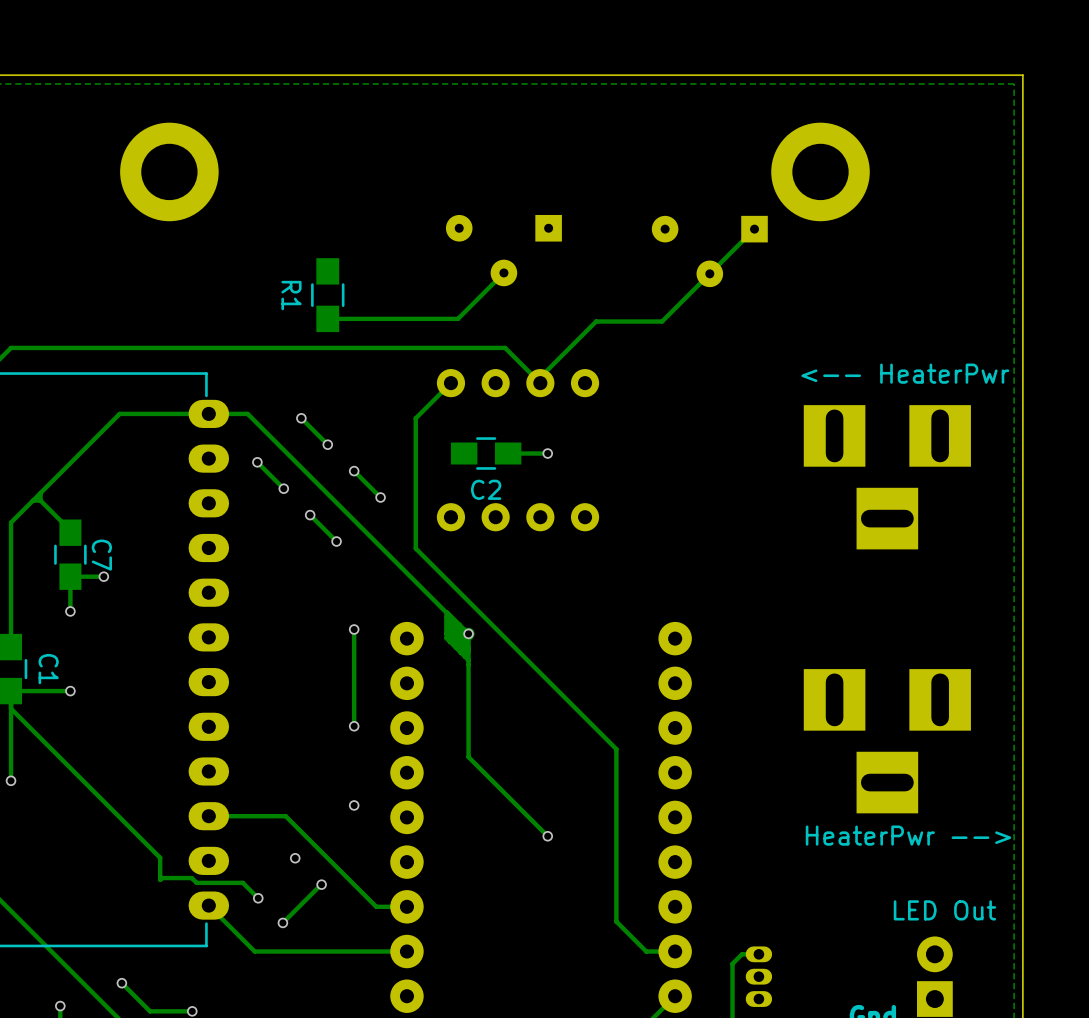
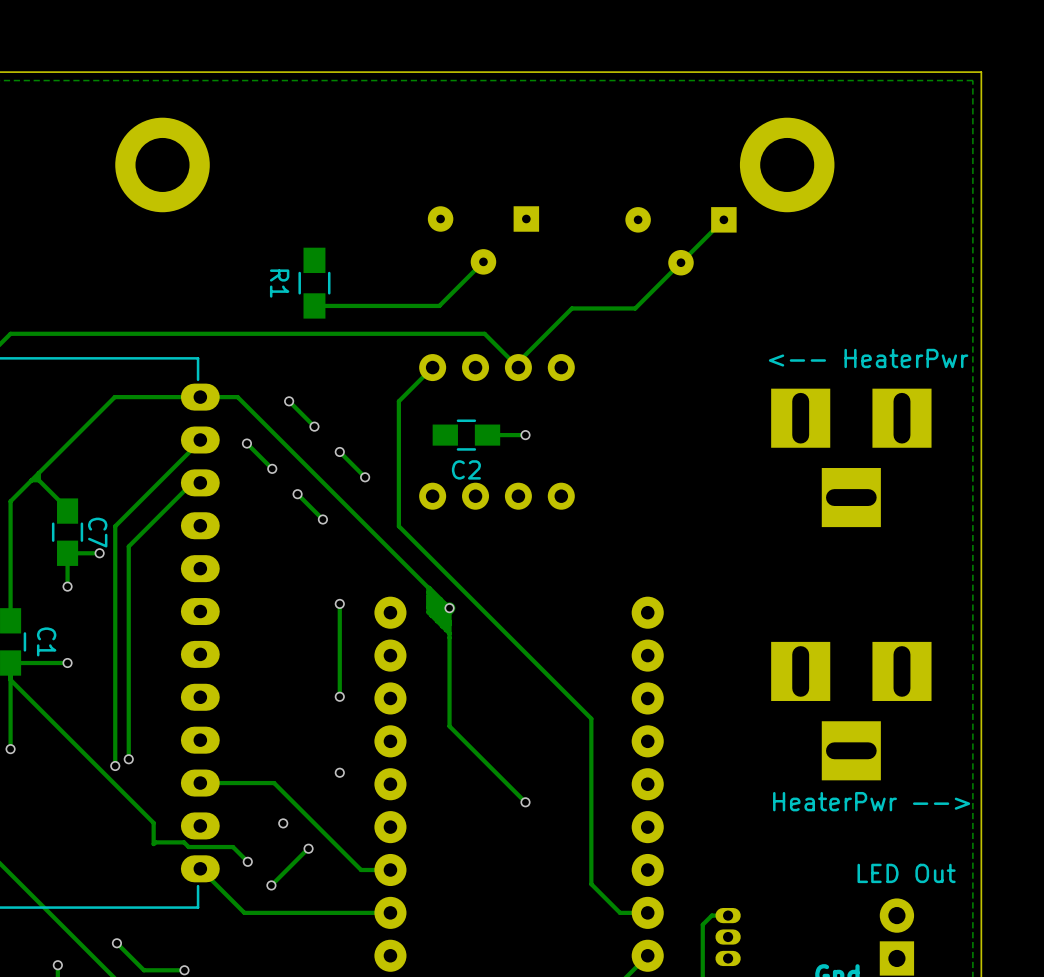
track: none -> (200, 439) (115, 526) (115, 766)
track: none -> (200, 482) (192, 482) (128, 546) (128, 759)
via: none -> (128, 759)
via: none -> (115, 766)

